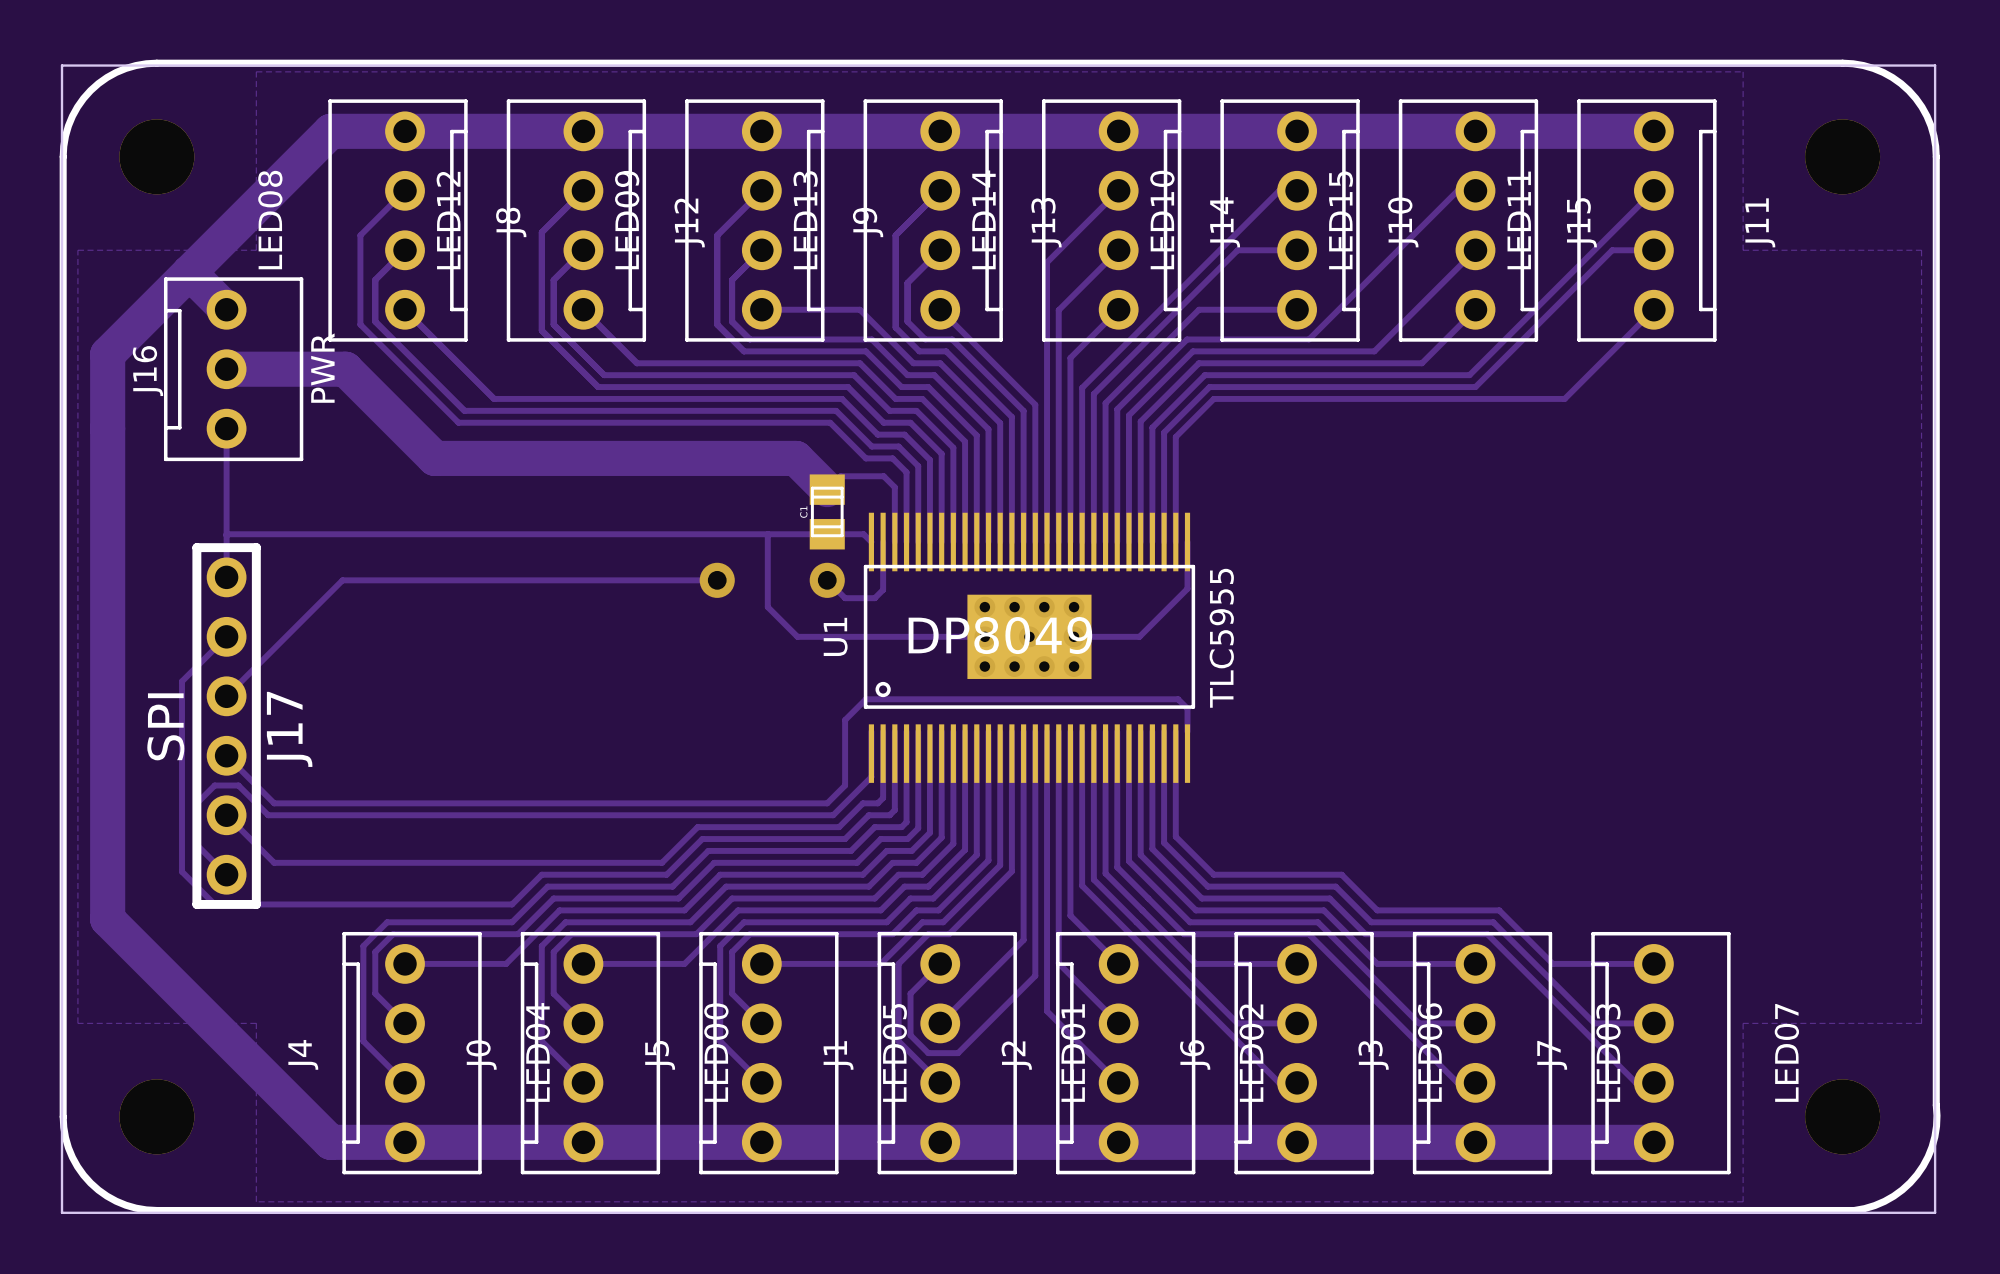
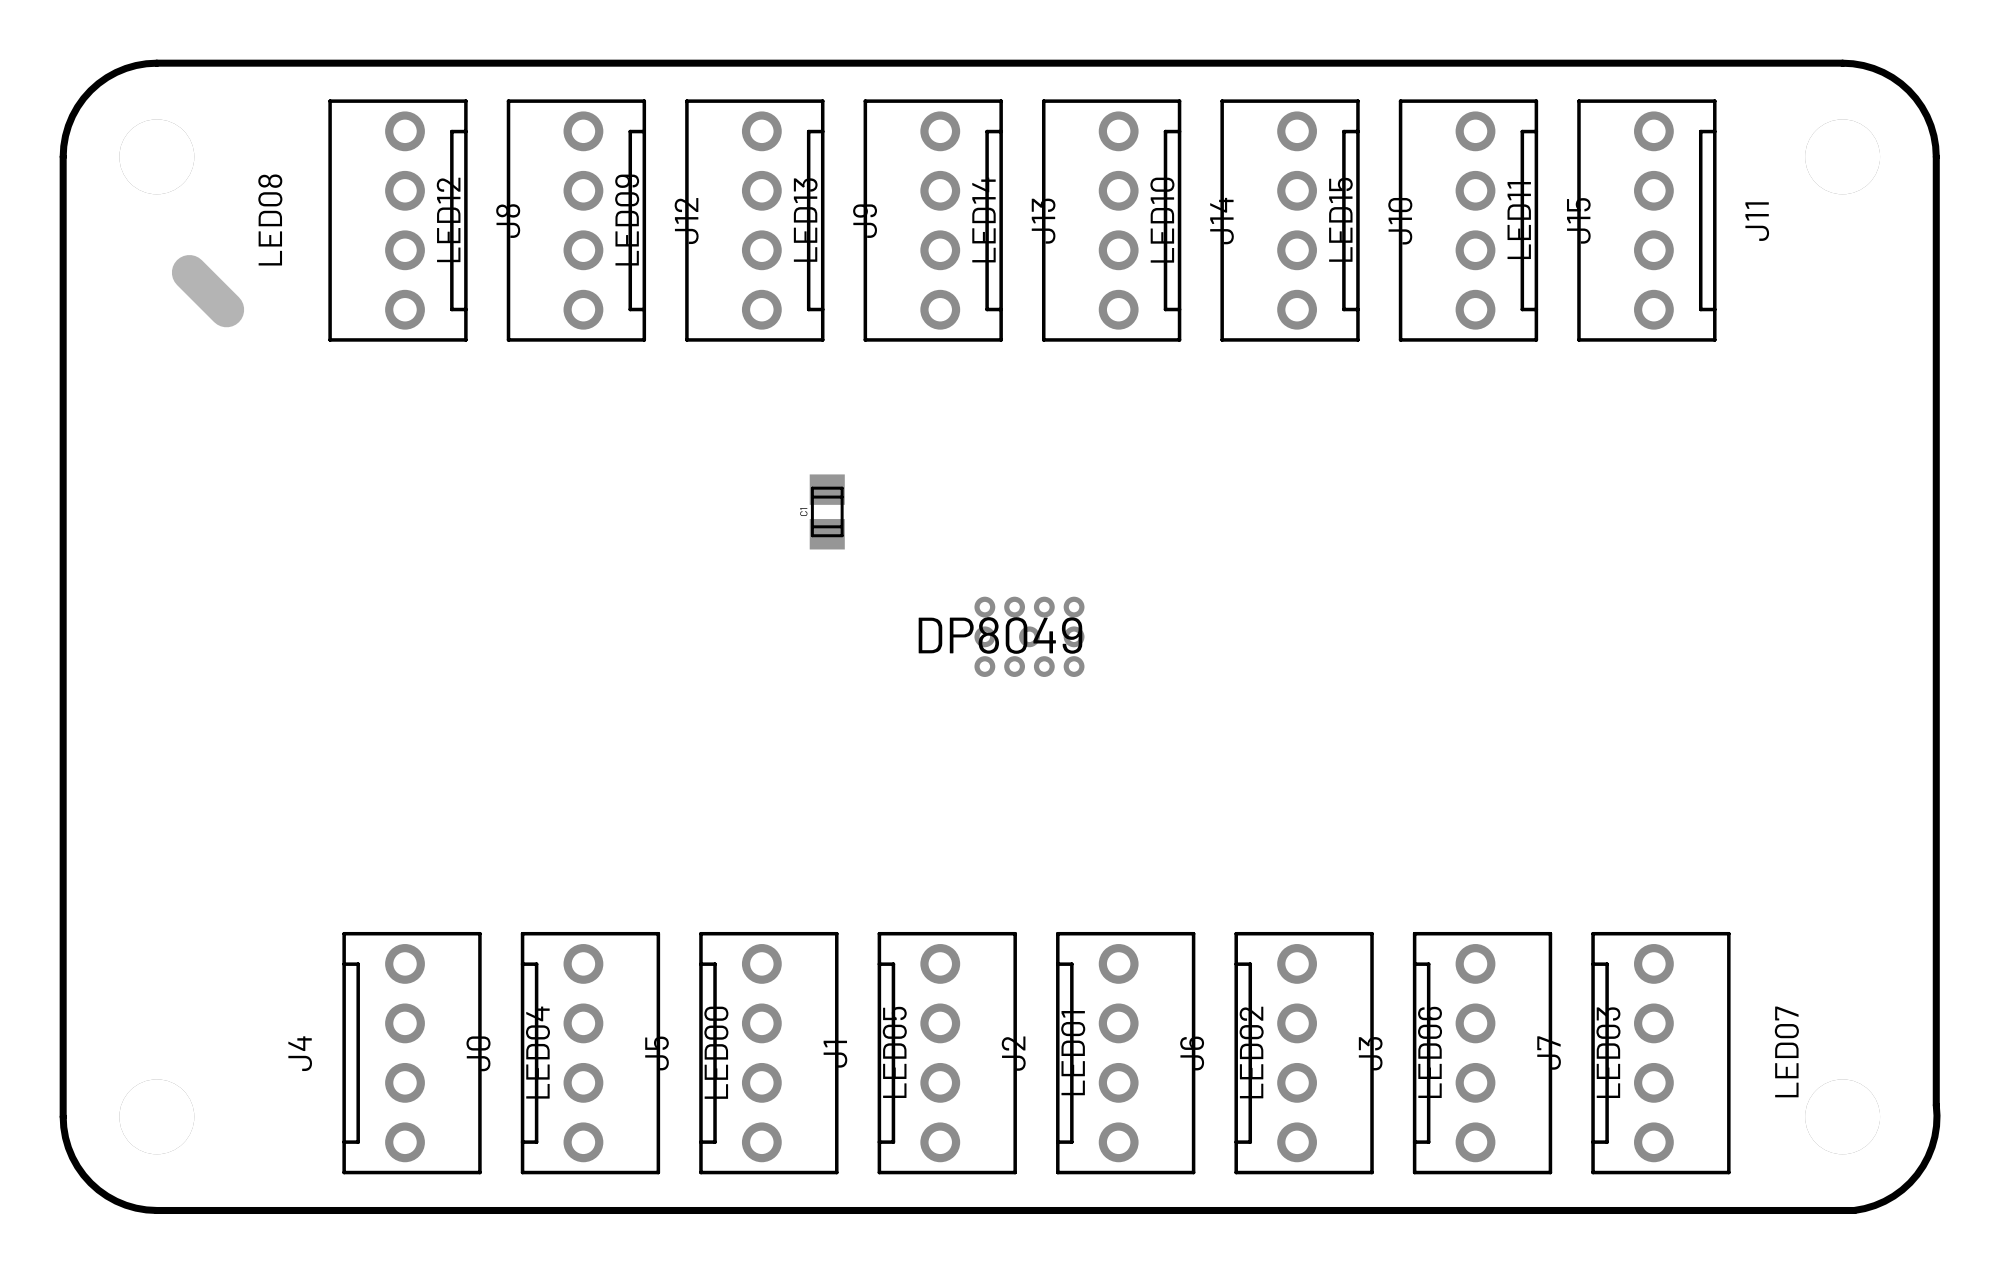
board edge: (62, 65) (62, 1212) (1935, 1212) (1935, 65) (62, 65) -> none
zone outline: (256, 71) (256, 250) (77, 250) (77, 1023) (256, 1023) (256, 1201) (1743, 1201) (1743, 1023) (1921, 1023) (1921, 250) (1743, 250) (1743, 71) (256, 71) -> none
track: (1653, 131) (330, 131) (107, 354) (107, 919) (330, 1142) (1653, 1142) -> none
track: (405, 190) (360, 235) (360, 324) (458, 422) (830, 422) (865, 458) (892, 458) (906, 472) (906, 542) -> none
track: (583, 190) (541, 232) (541, 330) (598, 387) (848, 387) (883, 422) (910, 422) (941, 453) (941, 542) -> none
track: (761, 190) (717, 235) (717, 324) (744, 351) (865, 351) (901, 387) (928, 387) (976, 435) (976, 542) -> none
track: (940, 190) (895, 235) (895, 327) (919, 351) (946, 351) (1011, 417) (1011, 542) -> none
track: (1118, 190) (1047, 262) (1047, 542) -> none
track: (1297, 190) (1279, 190) (1082, 387) (1082, 542) -> none
track: (1475, 190) (1457, 190) (1308, 339) (1187, 339) (1117, 409) (1117, 542) -> none
track: (1653, 190) (1469, 375) (1204, 375) (1152, 427) (1152, 542) -> none
track: (405, 250) (375, 280) (375, 321) (464, 410) (836, 410) (871, 446) (898, 446) (918, 466) (918, 542) -> none
track: (583, 250) (553, 280) (553, 324) (604, 375) (854, 375) (889, 410) (916, 410) (953, 447) (953, 542) -> none
track: (761, 250) (732, 280) (732, 321) (749, 339) (871, 339) (907, 375) (934, 375) (988, 429) (988, 542) -> none
track: (940, 250) (907, 282) (907, 321) (925, 339) (952, 339) (1023, 410) (1023, 542) -> none
track: (1118, 250) (1058, 310) (1058, 542) -> none
track: (1297, 250) (1237, 250) (1093, 394) (1093, 542) -> none
track: (1475, 250) (1374, 351) (1193, 351) (1128, 415) (1128, 542) -> none
track: (1653, 250) (1612, 250) (1475, 387) (1209, 387) (1164, 432) (1164, 542) -> none
track: (405, 309) (494, 398) (842, 398) (877, 434) (904, 434) (929, 460) (929, 542) -> none
track: (583, 309) (636, 363) (859, 363) (895, 398) (922, 398) (965, 441) (965, 542) -> none
track: (761, 309) (859, 309) (913, 363) (940, 363) (1000, 423) (1000, 542) -> none
track: (940, 309) (1035, 404) (1035, 542) -> none
track: (1118, 309) (1070, 357) (1070, 542) -> none
track: (1297, 309) (1198, 309) (1105, 403) (1105, 542) -> none
track: (1475, 309) (1421, 363) (1198, 363) (1140, 421) (1140, 542) -> none
track: (1653, 309) (1564, 398) (1213, 398) (1175, 436) (1175, 542) -> none
track: (226, 369) (345, 369) (434, 458) (796, 458) (827, 489) (840, 476) (883, 476) (894, 487) (894, 542) -> none
J16: PWR (233, 369) -> none
track: (226, 428) (226, 577) -> none
track: (226, 534) (863, 534) (871, 542) -> none
track: (767, 534) (767, 607) (797, 636) (1139, 636) (1187, 588) (1187, 542) -> none
track: (883, 542) (883, 589) (874, 598) (845, 598) (827, 580) -> none
track: (717, 580) (342, 580) (226, 696) -> none
via: (717, 580) -> none
via: (827, 580) -> none
track: (226, 636) (182, 681) (182, 871) (214, 904) (512, 904) (541, 874) (666, 874) (702, 839) (845, 839) (868, 815) (889, 815) (894, 810) (894, 731) -> none
U1: TLC5955 (1029, 647) -> none
J17: SPI (226, 726) -> none
track: (871, 731) (871, 777) (833, 815) (268, 815) (238, 785) (214, 785) (196, 803) (196, 844) (226, 874) -> none
track: (883, 731) (883, 798) (877, 803) (862, 803) (839, 827) (697, 827) (662, 862) (274, 862) (226, 815) -> none
track: (906, 731) (906, 822) (901, 827) (874, 827) (851, 850) (708, 850) (672, 886) (547, 886) (512, 922) (387, 922) (363, 946) (363, 1041) (405, 1082) -> none
track: (918, 731) (918, 828) (907, 839) (880, 839) (857, 862) (714, 862) (678, 898) (553, 898) (518, 934) (393, 934) (375, 952) (375, 993) (405, 1023) -> none
track: (929, 731) (929, 832) (911, 850) (886, 850) (862, 874) (720, 874) (684, 910) (559, 910) (506, 963) (405, 963) -> none
track: (941, 731) (941, 837) (916, 862) (892, 862) (868, 886) (726, 886) (690, 922) (565, 922) (541, 946) (541, 1041) (583, 1082) -> none
track: (953, 731) (953, 843) (922, 874) (898, 874) (874, 898) (732, 898) (696, 934) (571, 934) (553, 952) (553, 993) (583, 1023) -> none
track: (965, 731) (965, 849) (928, 886) (904, 886) (880, 910) (738, 910) (684, 963) (583, 963) -> none
track: (976, 731) (976, 854) (933, 898) (910, 898) (886, 922) (744, 922) (720, 946) (720, 1041) (761, 1082) -> none
track: (988, 731) (988, 860) (938, 910) (916, 910) (892, 934) (749, 934) (732, 952) (732, 993) (761, 1023) -> none
track: (1000, 731) (1000, 865) (943, 922) (922, 922) (880, 963) (761, 963) -> none
track: (1011, 731) (1011, 871) (949, 934) (928, 934) (898, 963) (898, 1041) (940, 1082) -> none
track: (1023, 731) (1023, 940) (940, 1023) -> none
track: (1035, 731) (1035, 975) (958, 1053) (928, 1053) (910, 1035) (910, 993) (940, 963) -> none
track: (1047, 731) (1047, 1011) (1118, 1082) -> none
track: (1058, 731) (1058, 963) (1118, 1023) -> none
track: (1070, 731) (1070, 915) (1118, 963) -> none
track: (1082, 731) (1082, 885) (1279, 1082) (1297, 1082) -> none
track: (1093, 731) (1093, 879) (1237, 1023) (1297, 1023) -> none
track: (1105, 731) (1105, 873) (1195, 963) (1297, 963) -> none
track: (1117, 731) (1117, 867) (1184, 934) (1308, 934) (1457, 1082) (1475, 1082) -> none
track: (1128, 731) (1128, 861) (1190, 922) (1317, 922) (1419, 1023) (1475, 1023) -> none
track: (1140, 731) (1140, 855) (1195, 910) (1323, 910) (1377, 963) (1475, 963) -> none
track: (1152, 731) (1152, 848) (1201, 898) (1329, 898) (1365, 934) (1487, 934) (1636, 1082) (1653, 1082) -> none
track: (1164, 731) (1164, 842) (1207, 886) (1335, 886) (1371, 922) (1493, 922) (1594, 1023) (1653, 1023) -> none
track: (1175, 731) (1175, 836) (1213, 874) (1341, 874) (1377, 910) (1499, 910) (1552, 963) (1653, 963) -> none
track: (1187, 731) (1187, 708) (1178, 699) (865, 699) (845, 720) (845, 785) (827, 803) (274, 803) (226, 755) -> none

